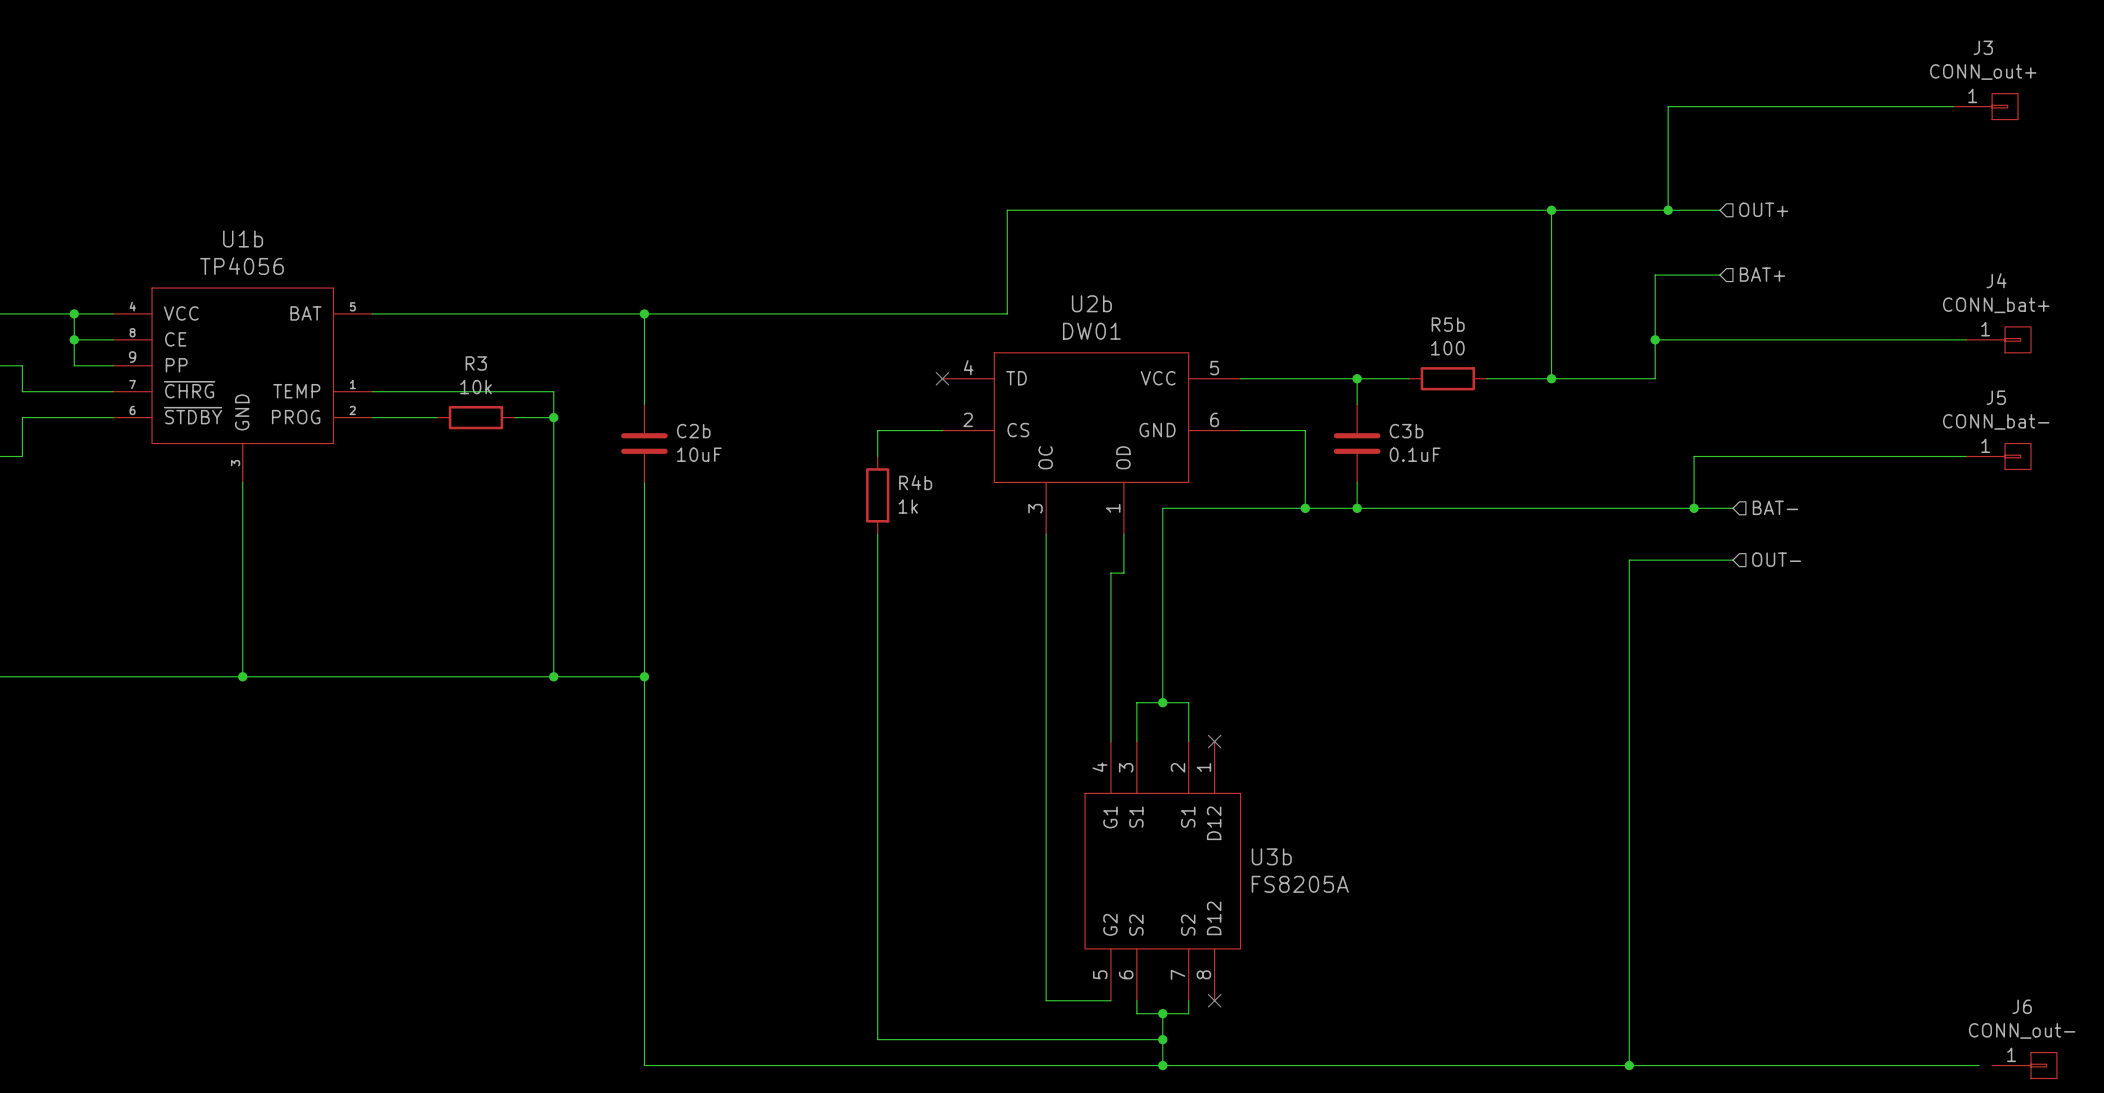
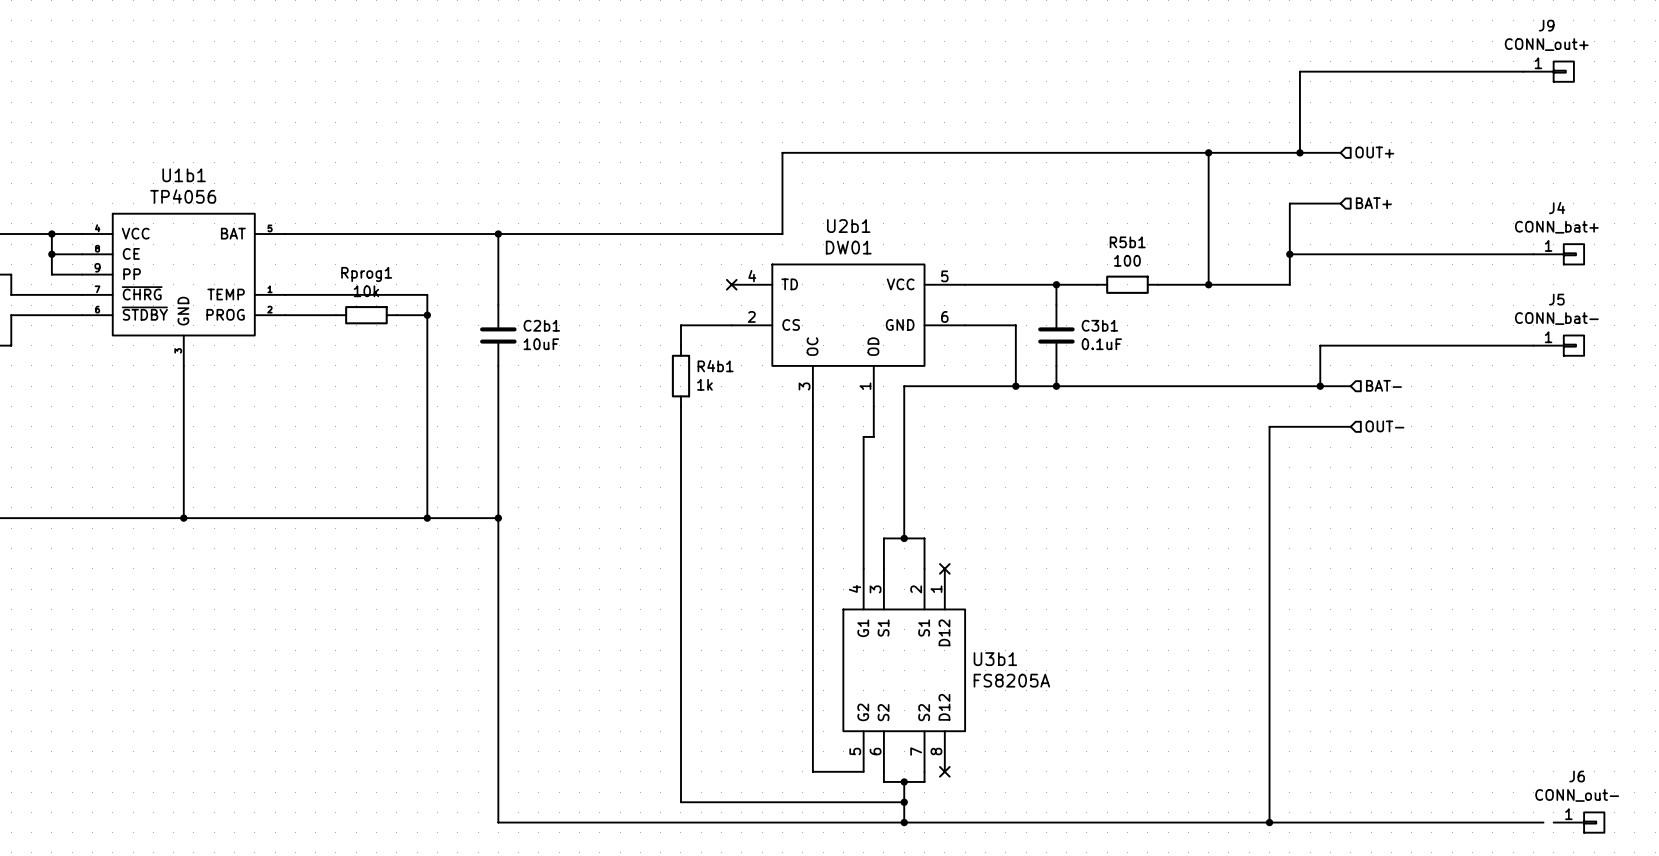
J3 name: J3 (1983, 47) -> J9 (1546, 25)
U1b name: U1b (243, 238) -> U1b1 (184, 175)
U2b name: U2b (1091, 303) -> U2b1 (848, 226)
R5b name: R5b (1448, 324) -> R5b1 (1127, 242)
R3 name: R3 (476, 363) -> Rprog1 (366, 274)
C2b name: C2b (693, 431) -> C2b1 (541, 325)
C3b name: C3b (1406, 431) -> C3b1 (1099, 325)
R4b name: R4b (915, 482) -> R4b1 (715, 366)
U3b name: U3b (1271, 856) -> U3b1 (995, 659)

